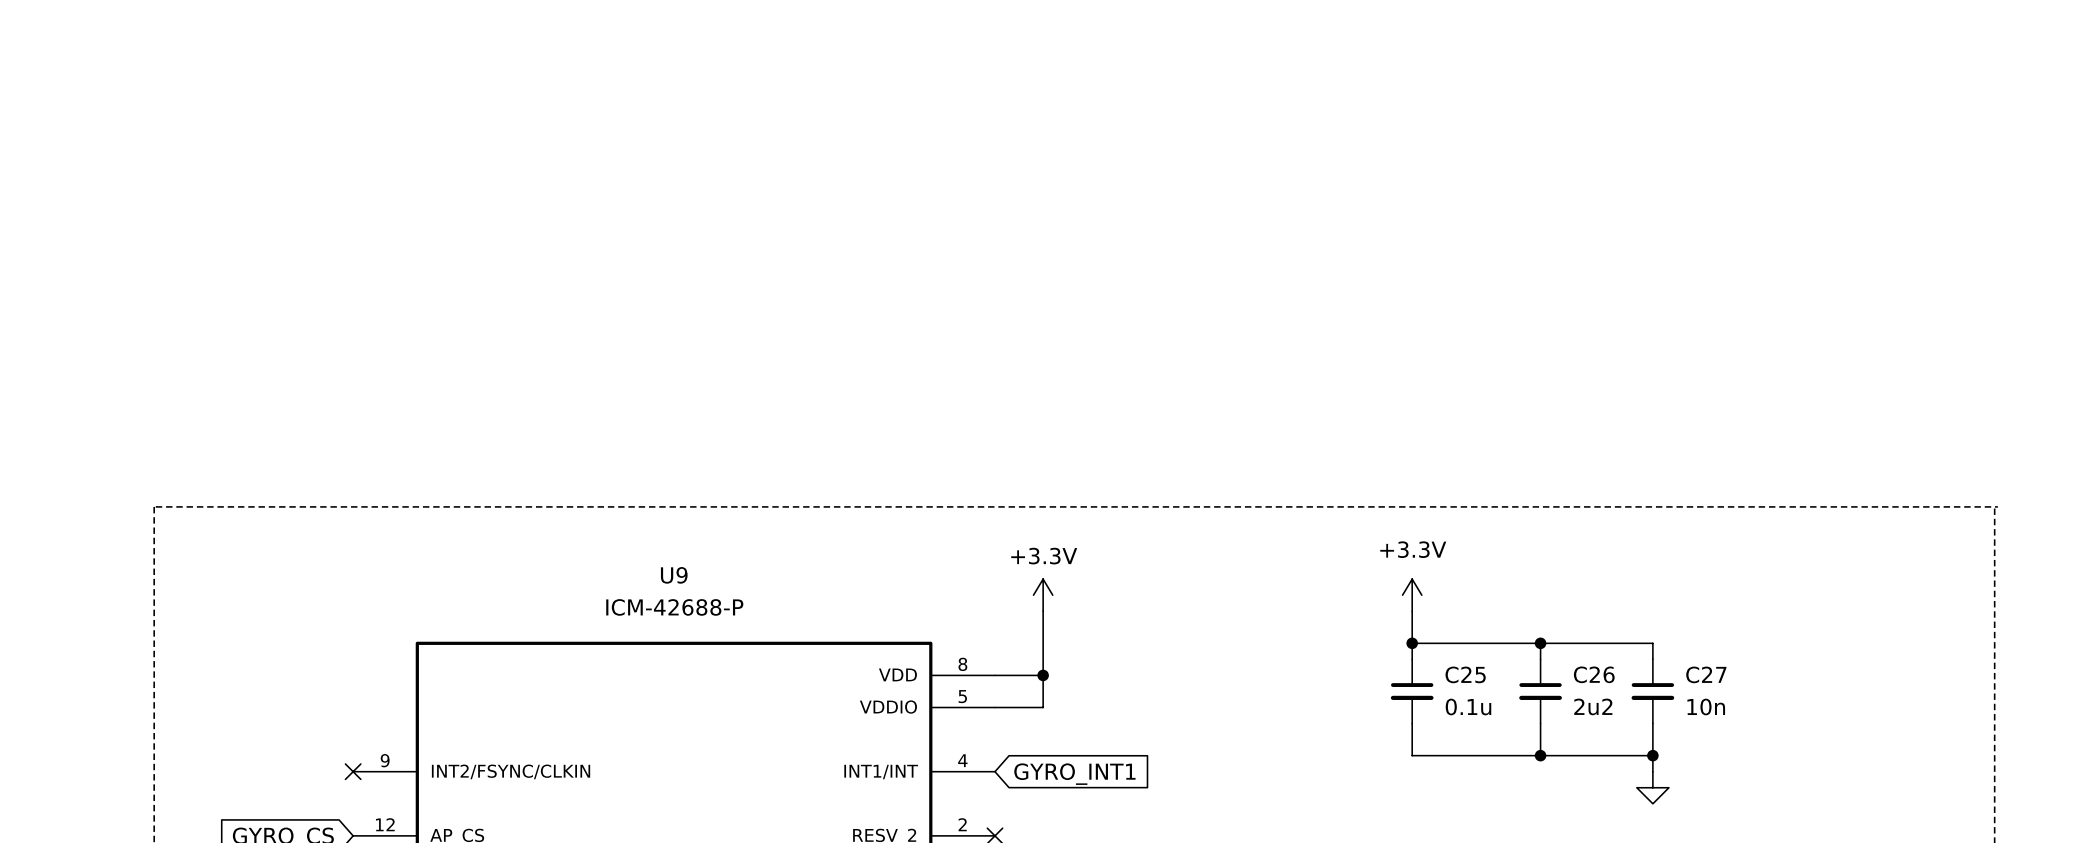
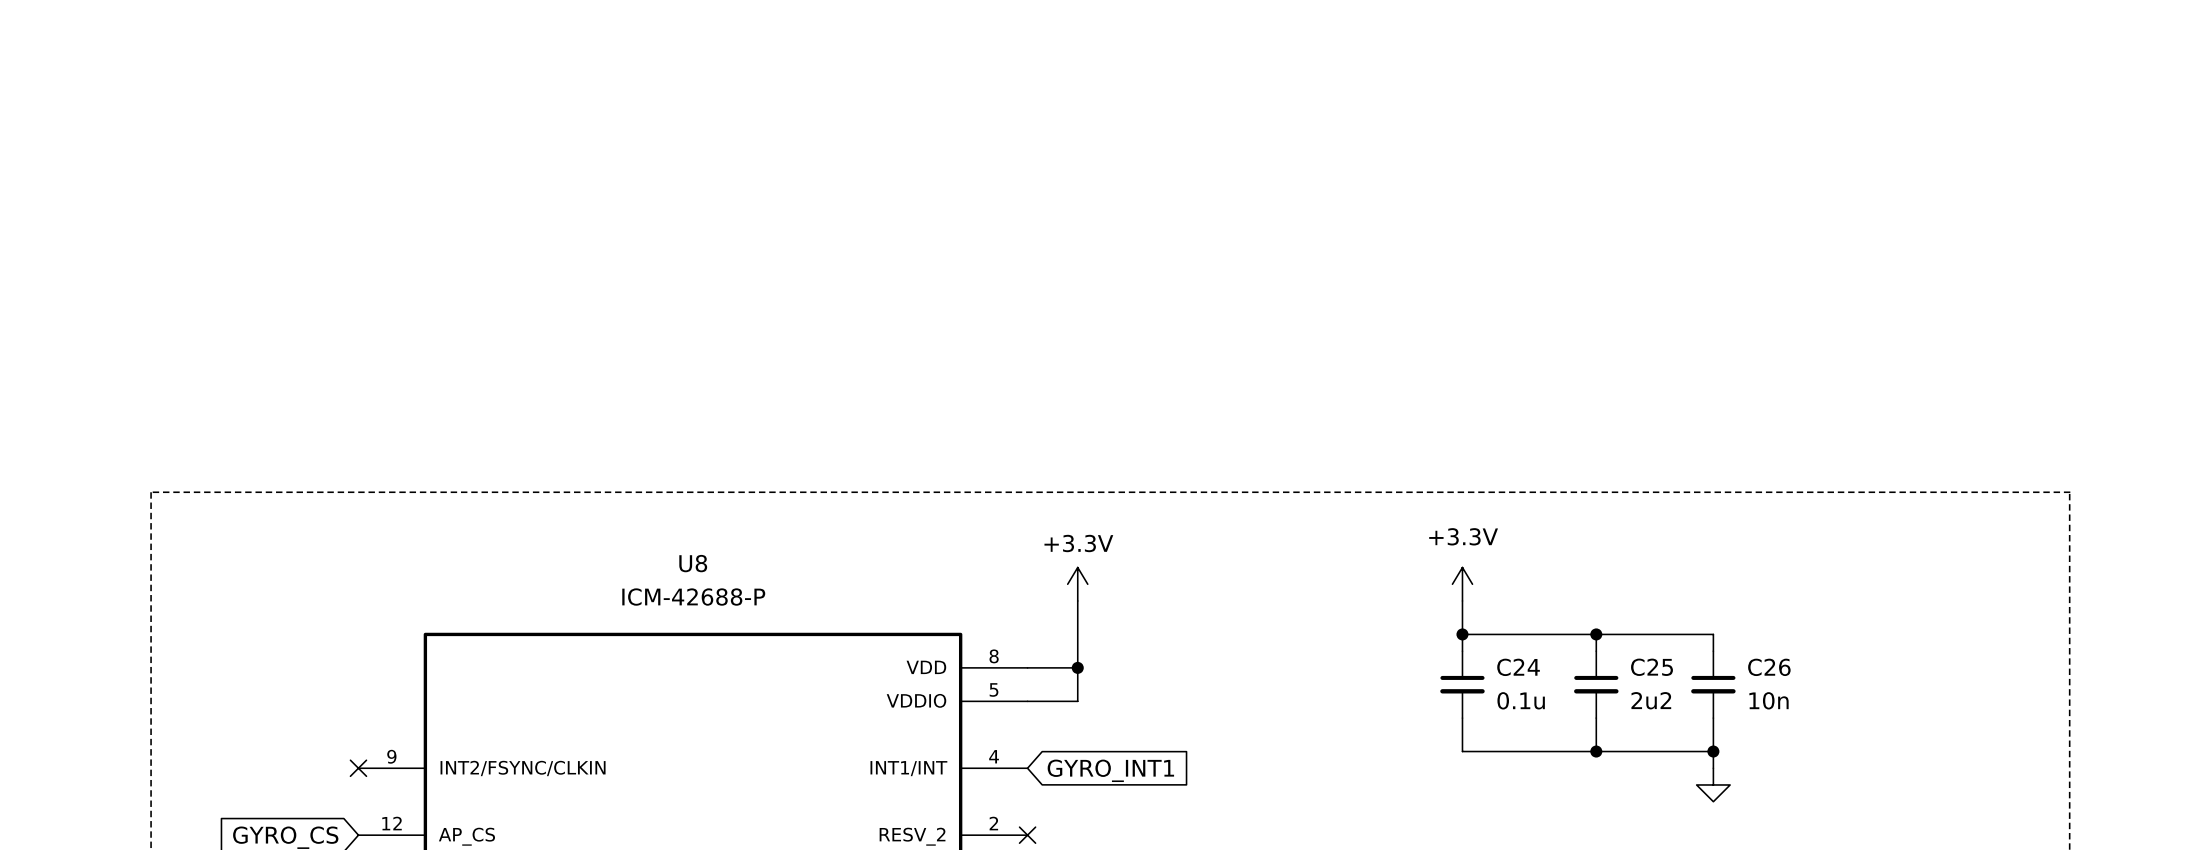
U9 name: U9 (674, 575) -> U8 (693, 563)
C25 name: C25 (1465, 674) -> C24 (1518, 667)
C26 name: C26 (1594, 674) -> C25 (1652, 667)
C27 name: C27 (1706, 674) -> C26 (1769, 667)

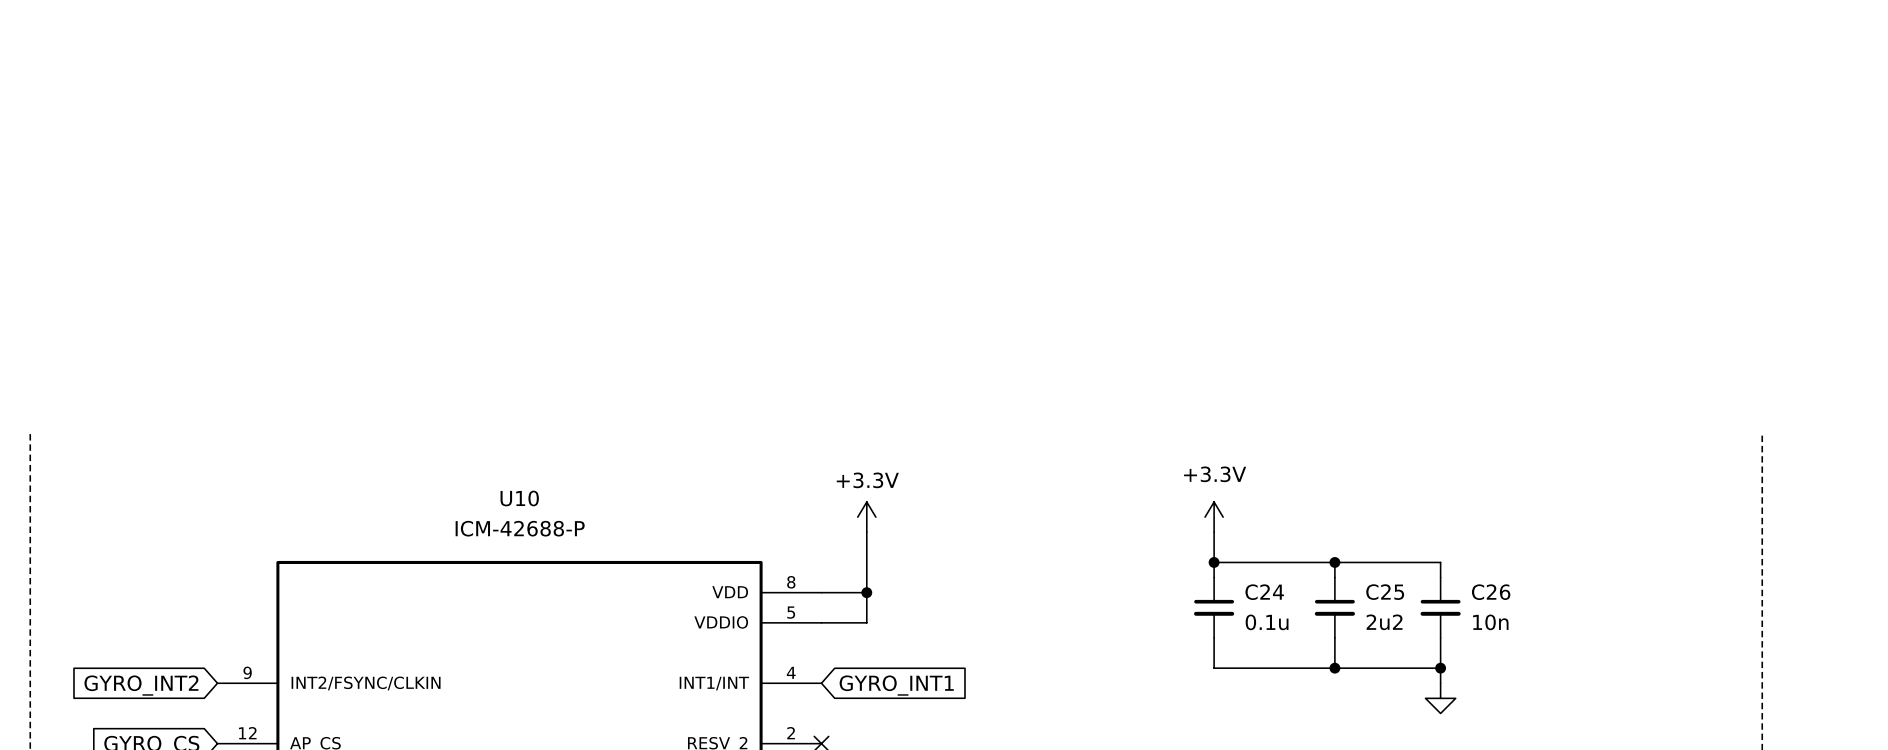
line: (152, 492) (2073, 492) -> none
U8 name: U8 (693, 563) -> U10 (519, 498)
no-connect mark: (358, 768) -> none
global label: none -> GYRO_INT2 (141, 685)

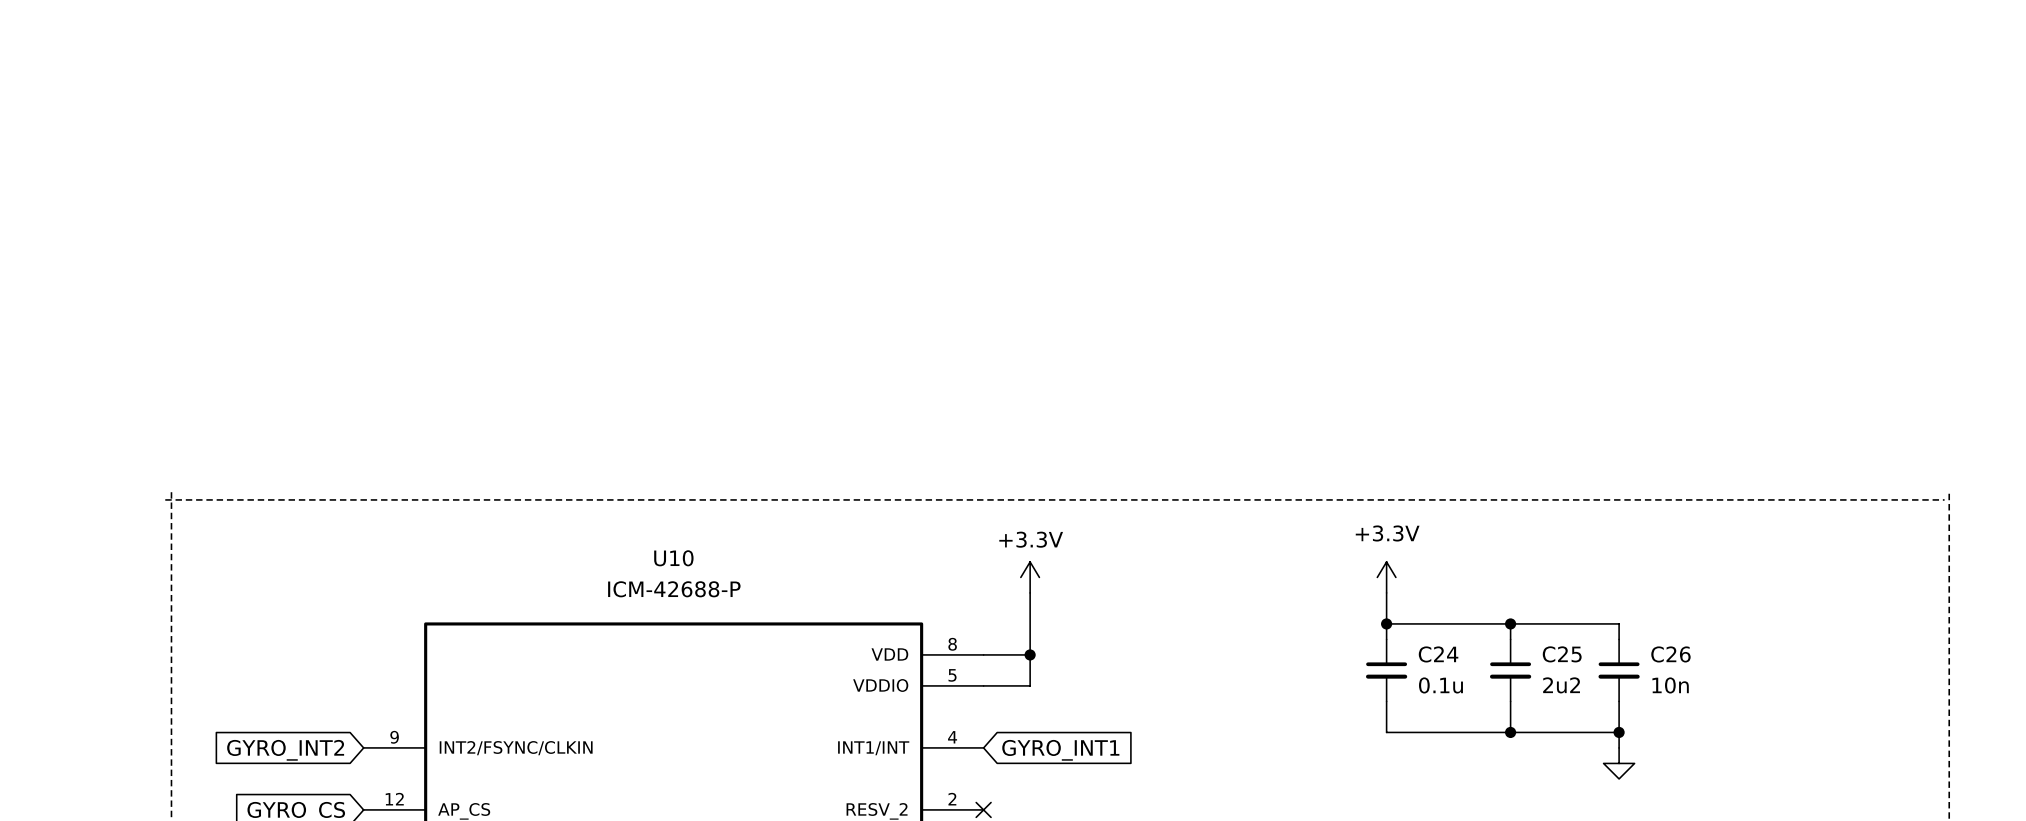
line: none -> (165, 499) (1944, 499)

